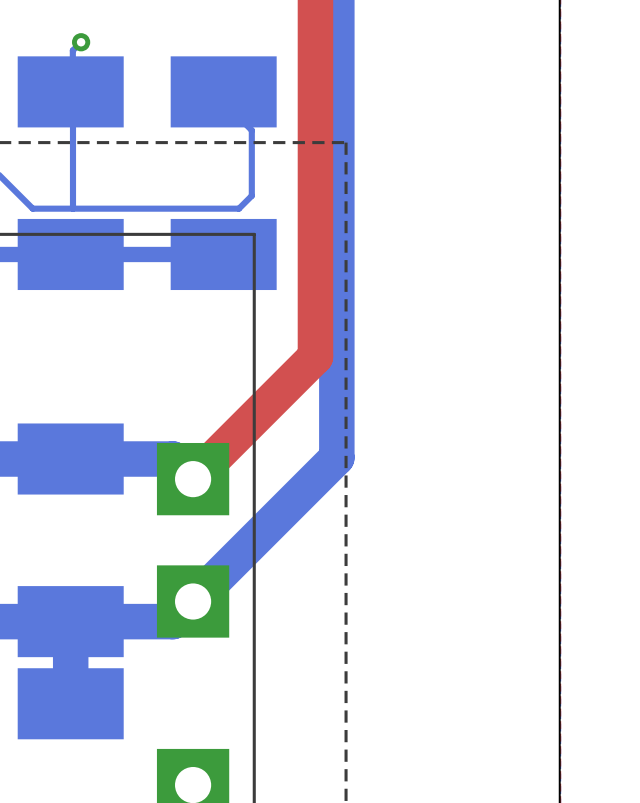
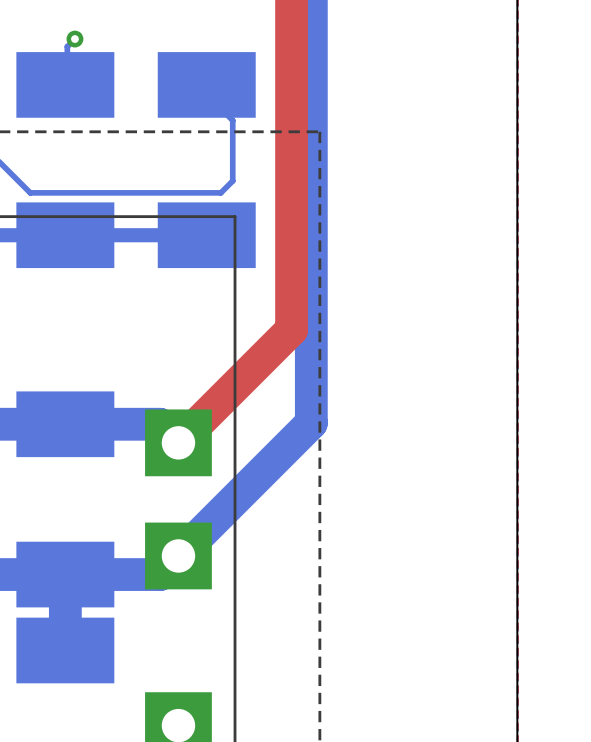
bottom track: (70, 91) (73, 94) (73, 208) -> none

